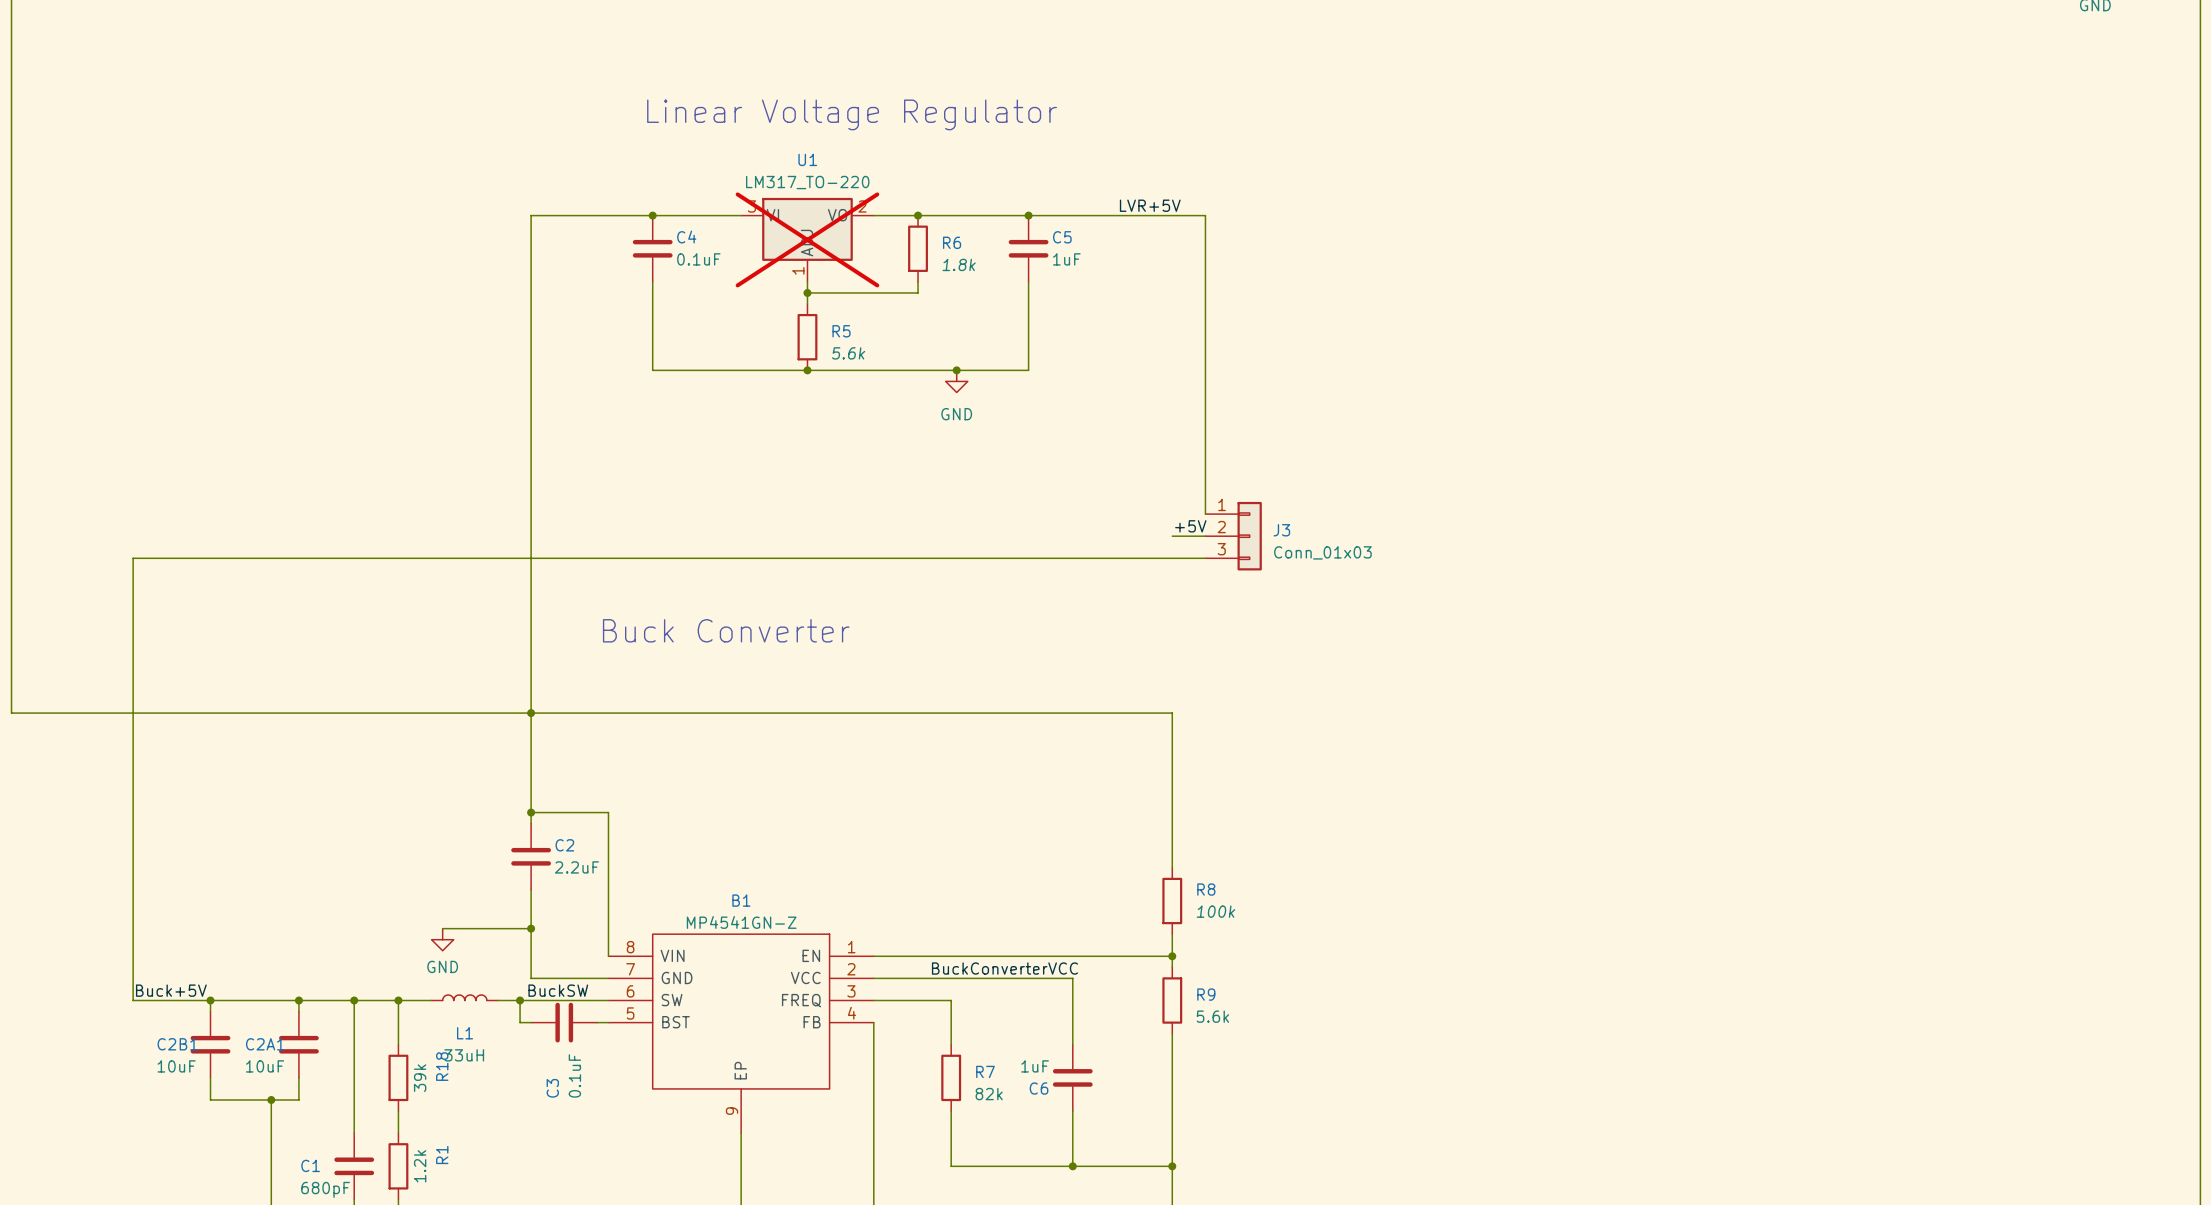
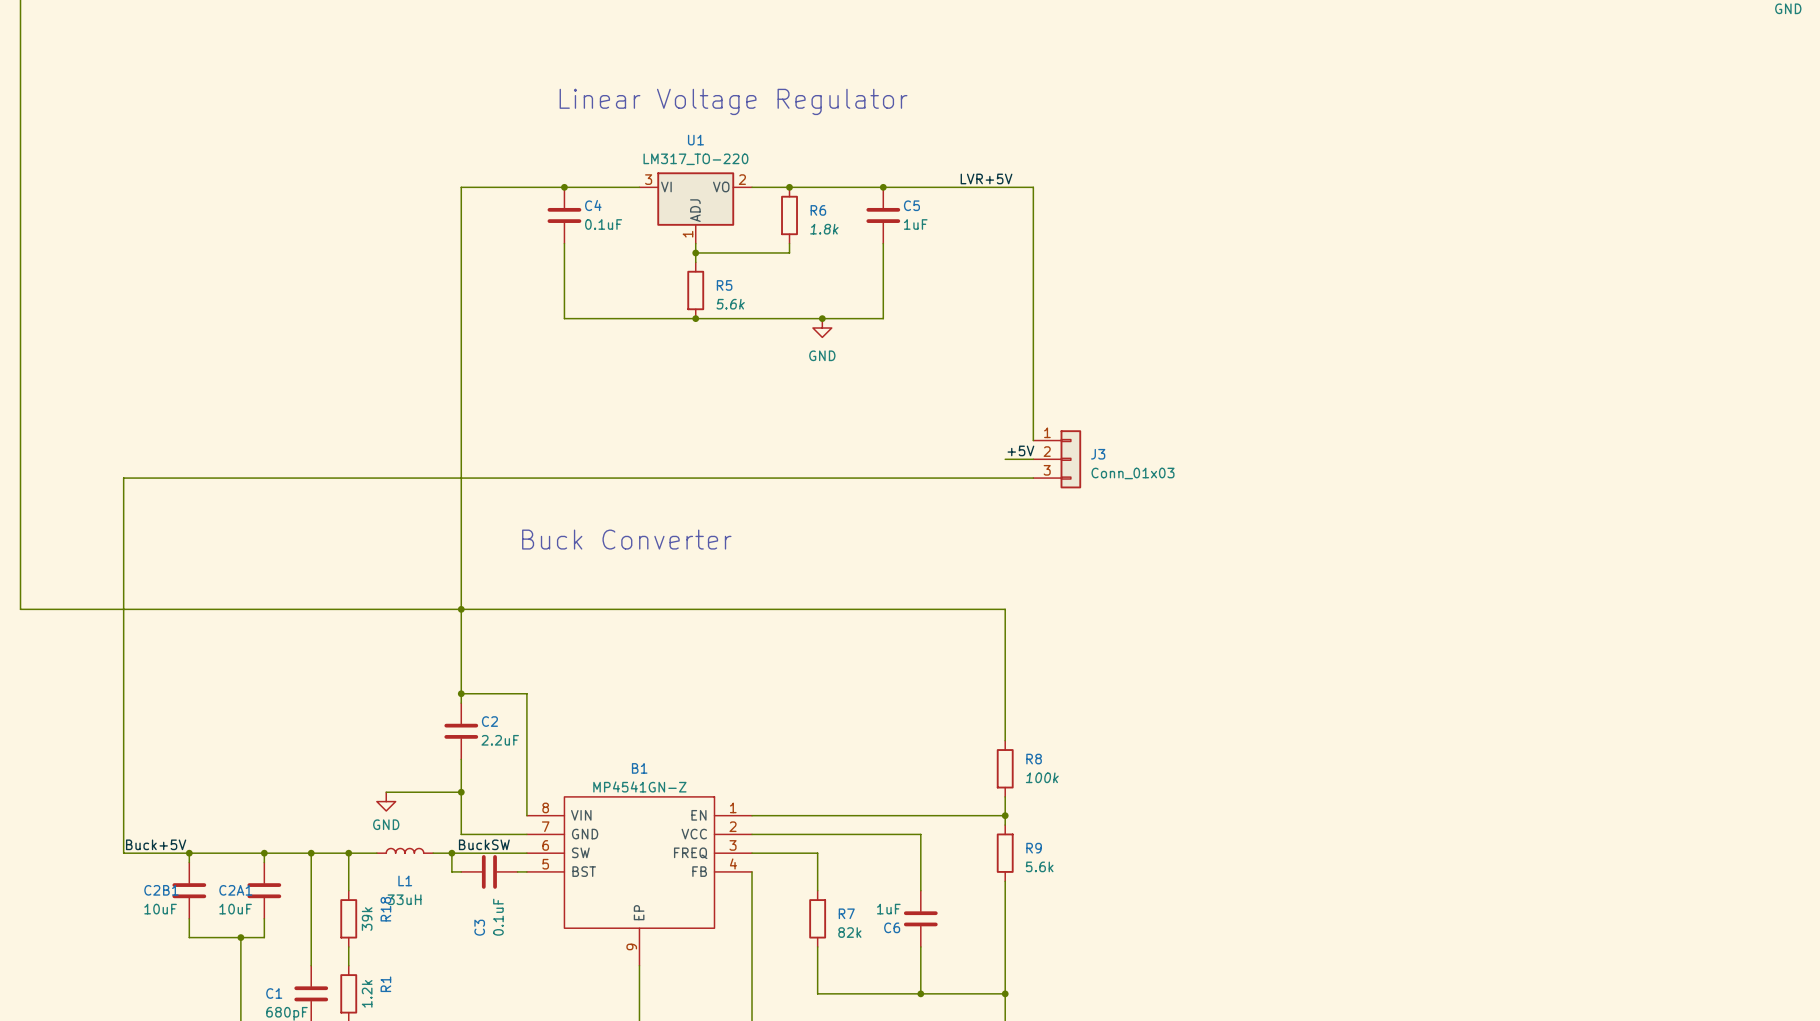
U1 do-not-place cross: (807, 239) -> none
label: BuckConverterVCC (1004, 968) -> none

